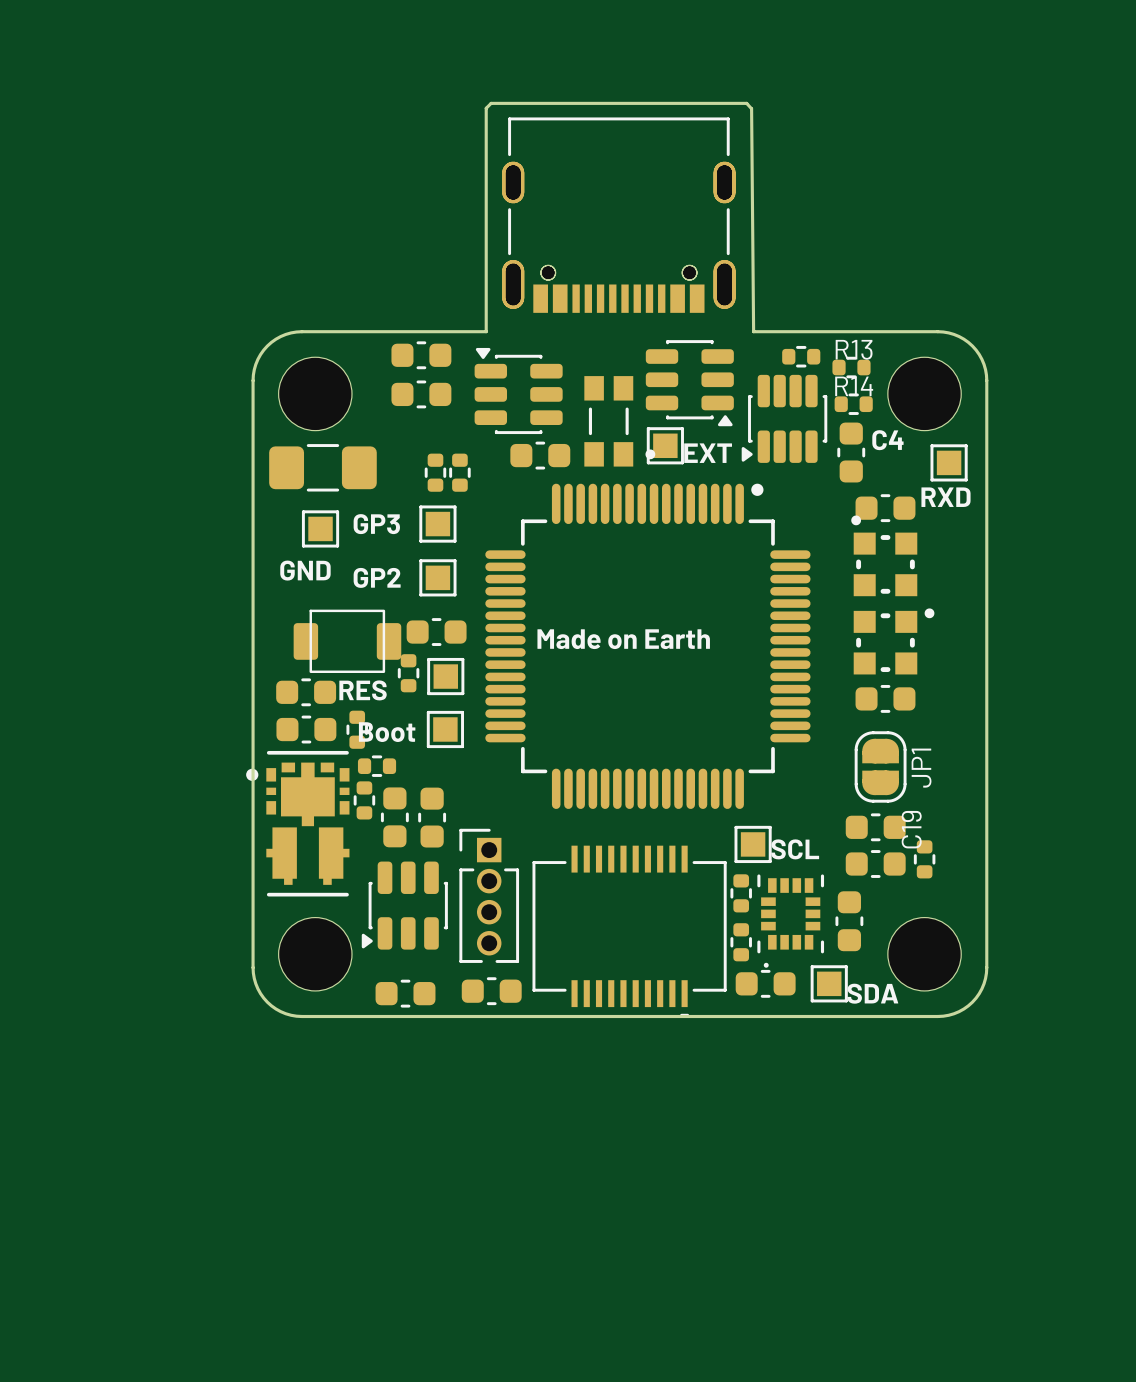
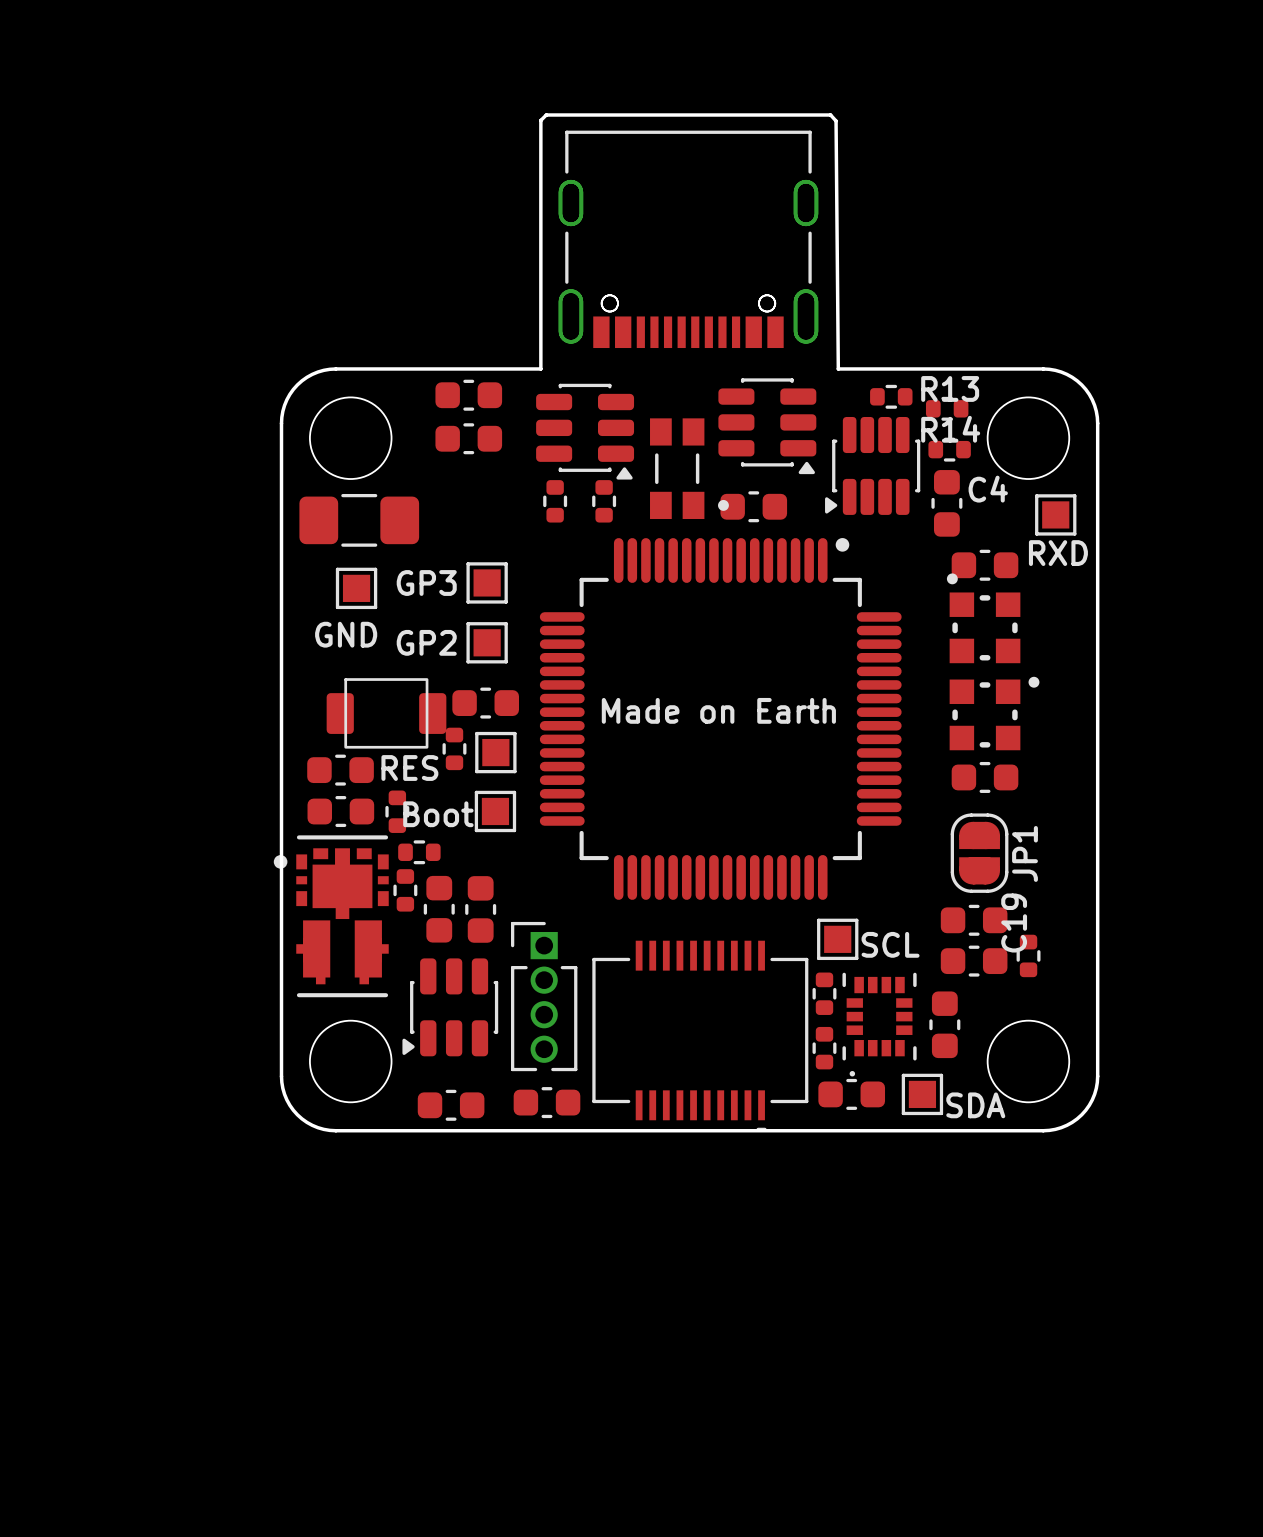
part rotation: 0° (518, 391) -> 180° (585, 431)
part footprint: [646, 427, 684, 465] -> [720, 491, 788, 523]
part footprint: [510, 441, 571, 470] -> [592, 480, 617, 523]
part: none -> (555, 501)
text: EXT (708, 453) -> none
part: (435, 472) -> none
part: (459, 472) -> none

